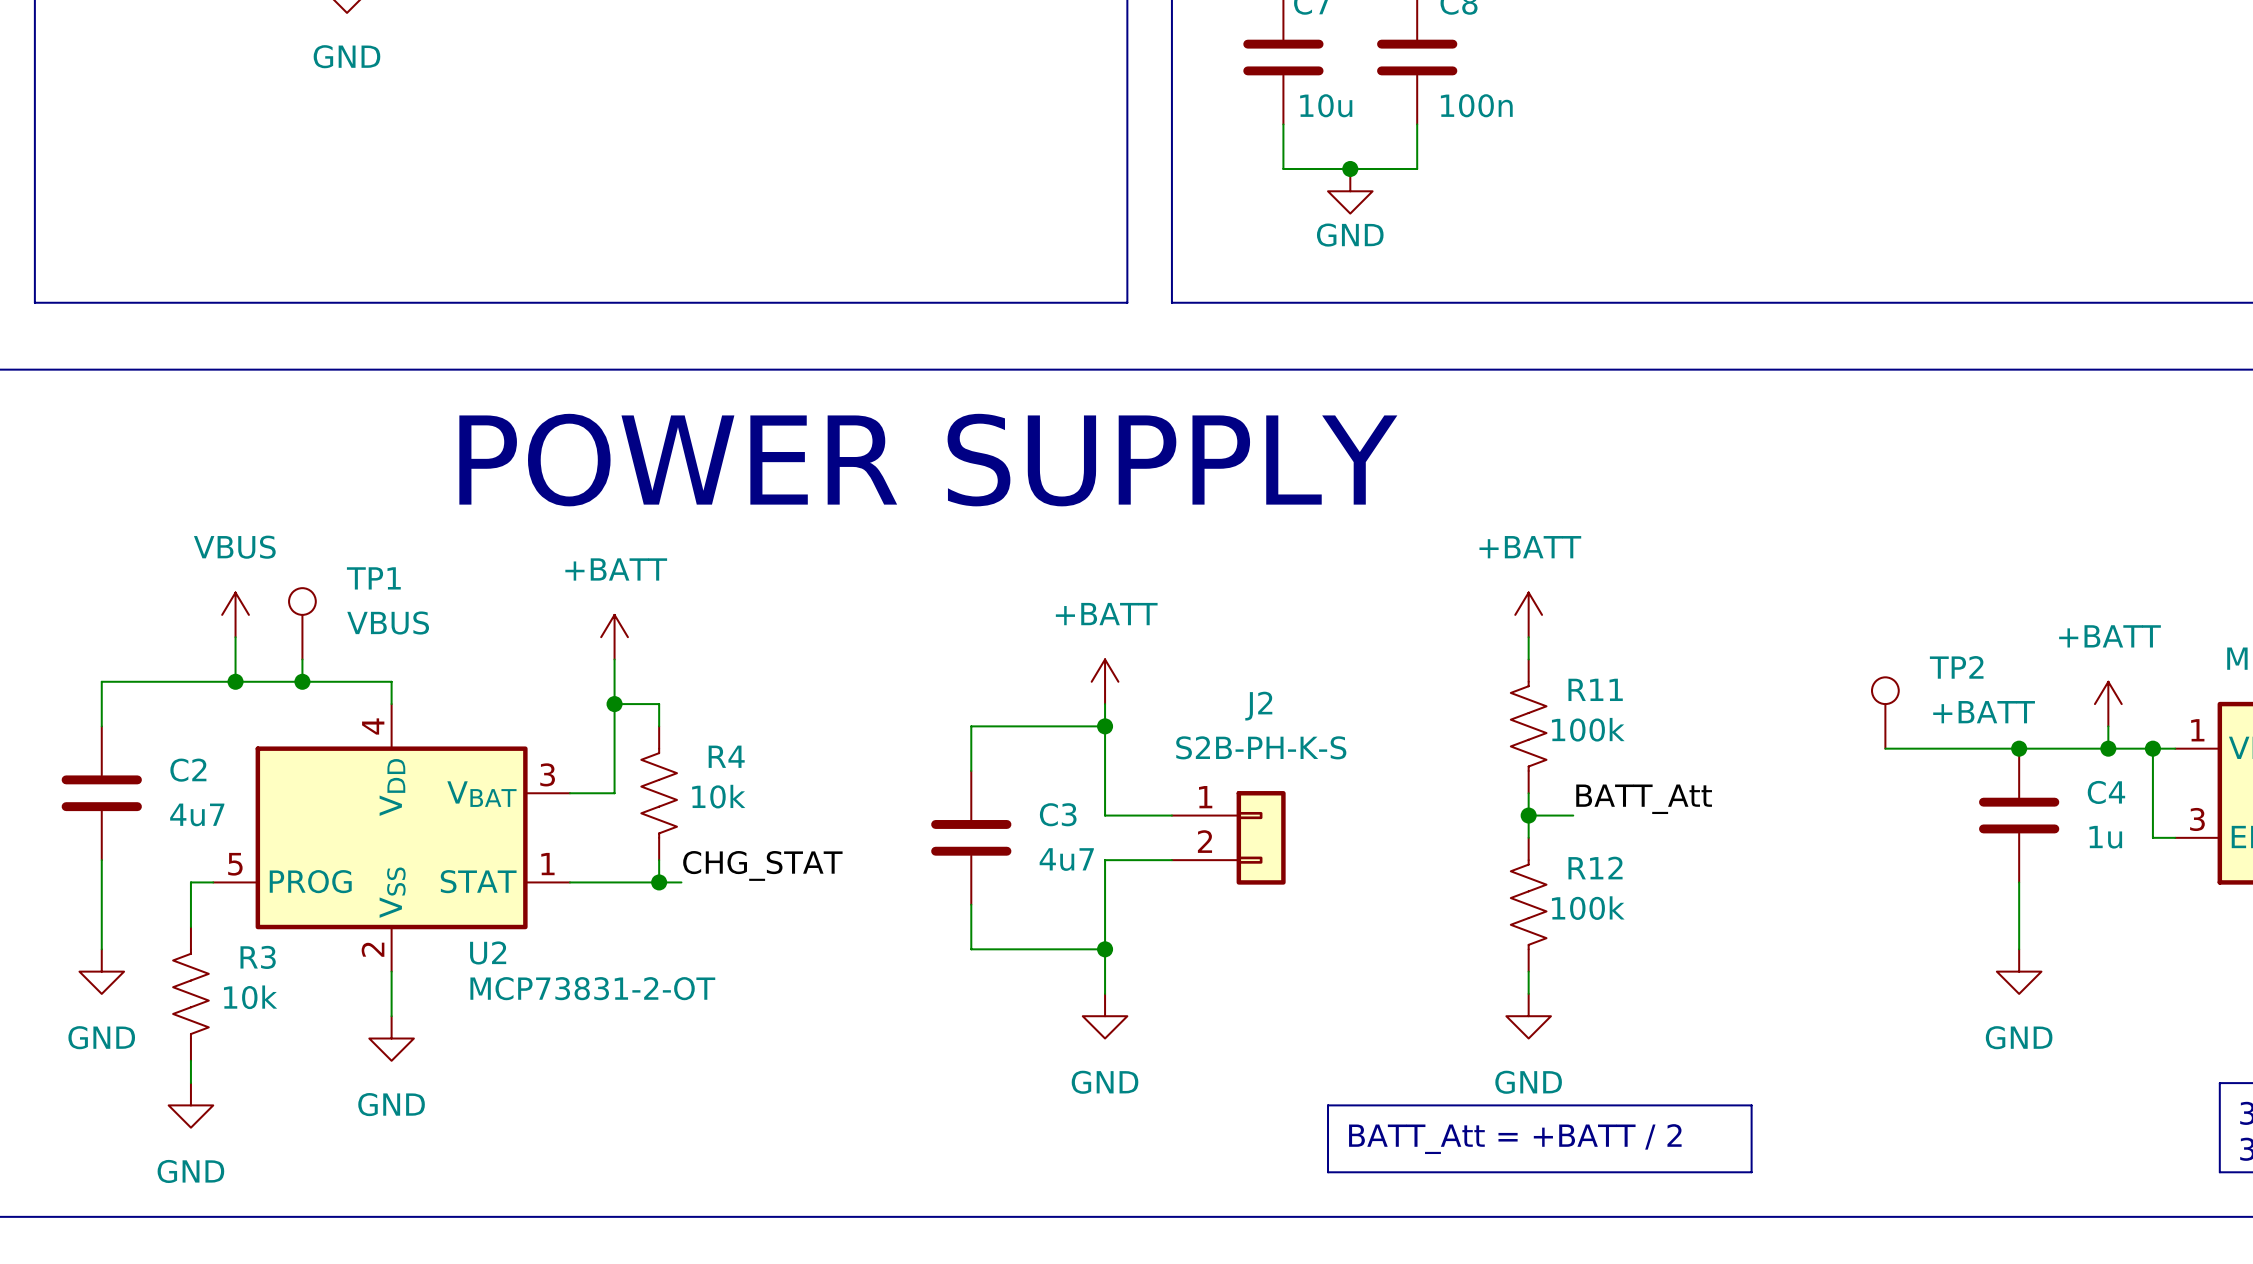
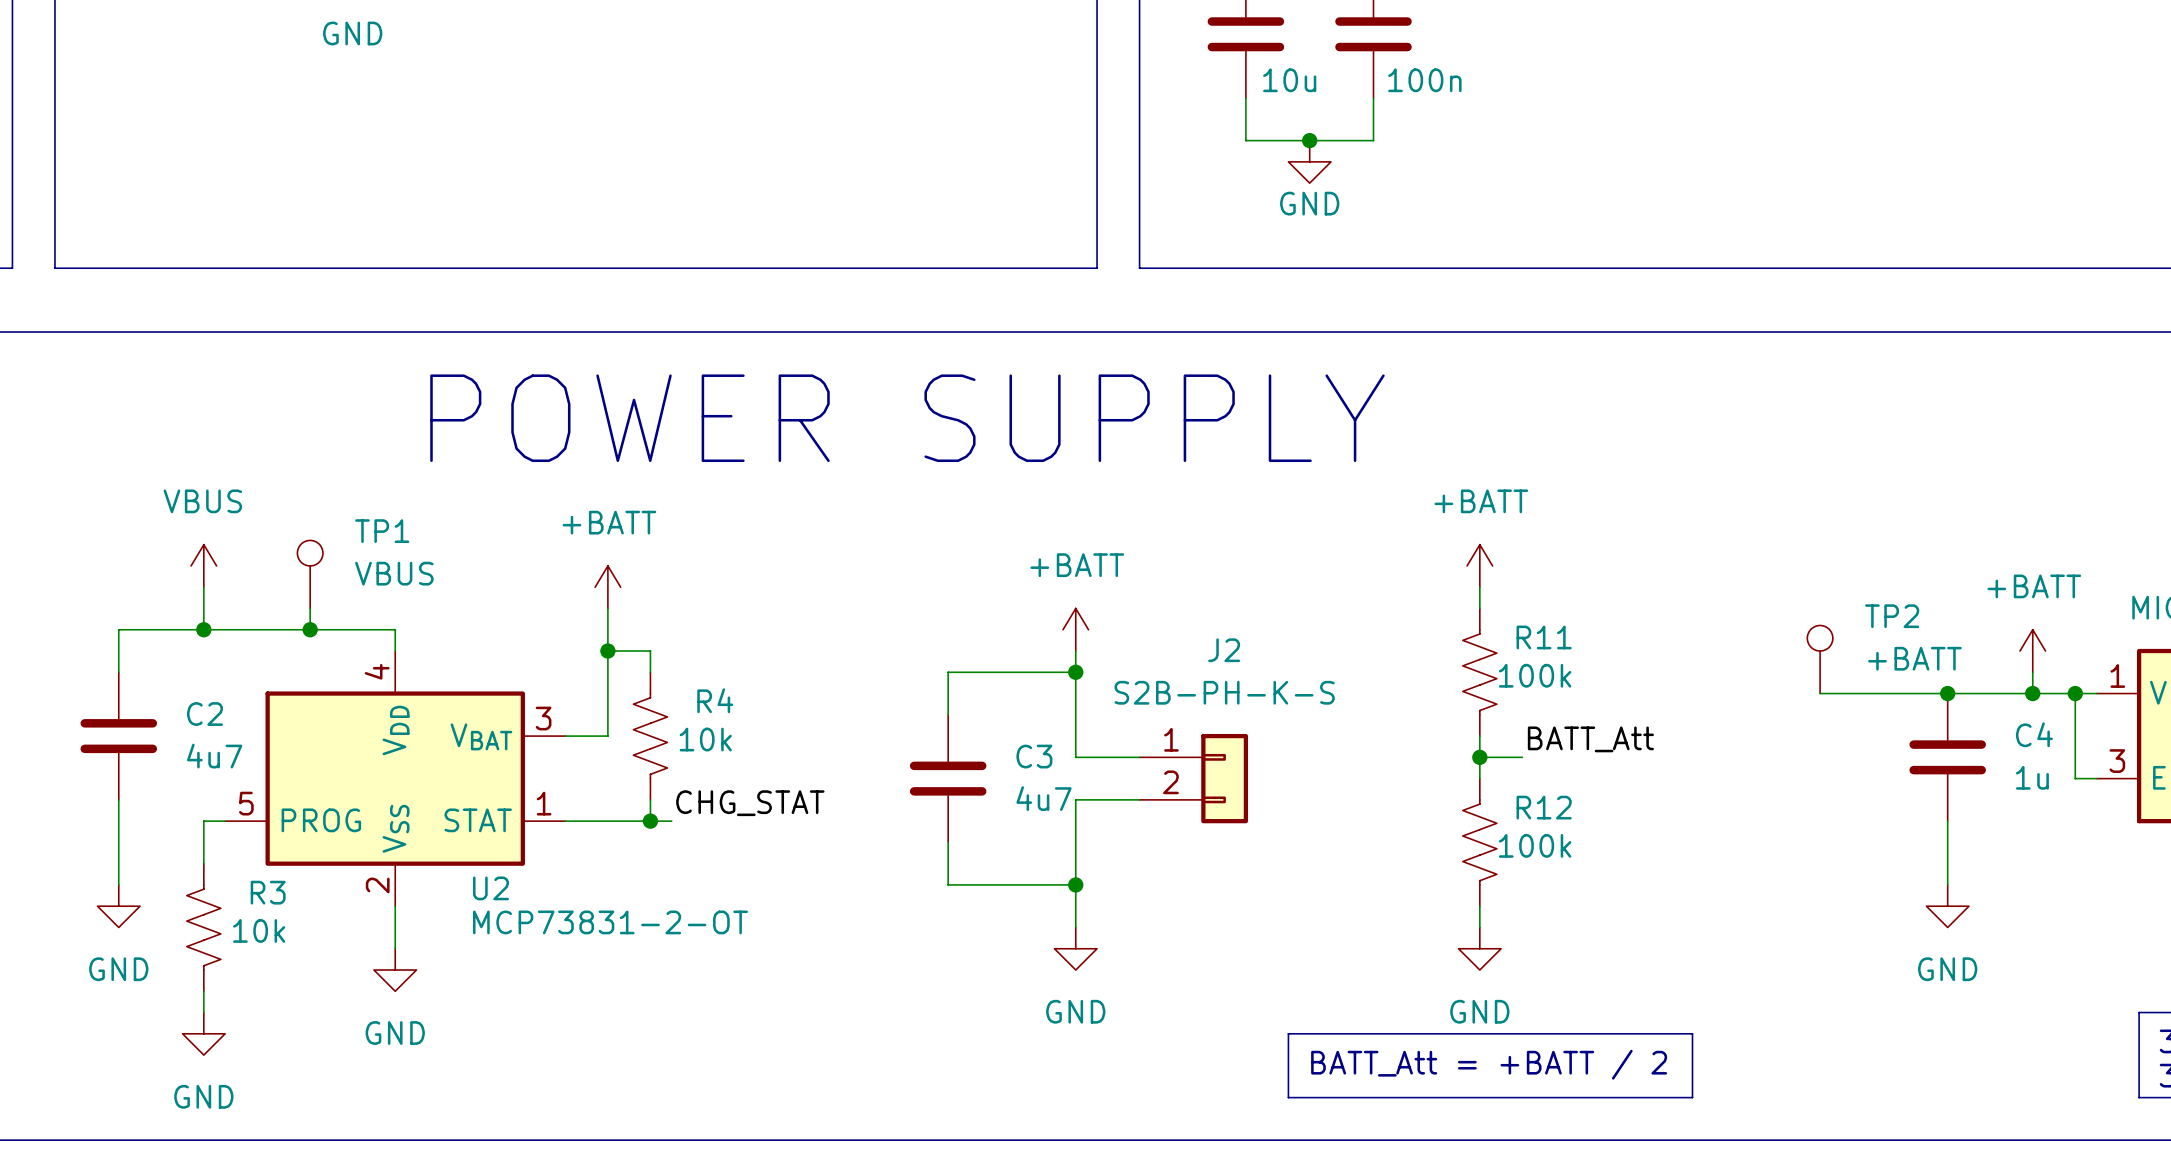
power symbol position: VBUS (235, 614) -> VBUS (203, 565)
wire: (235, 637) (235, 681) -> (203, 587) (203, 629)
junction position: (235, 681) -> (203, 629)

